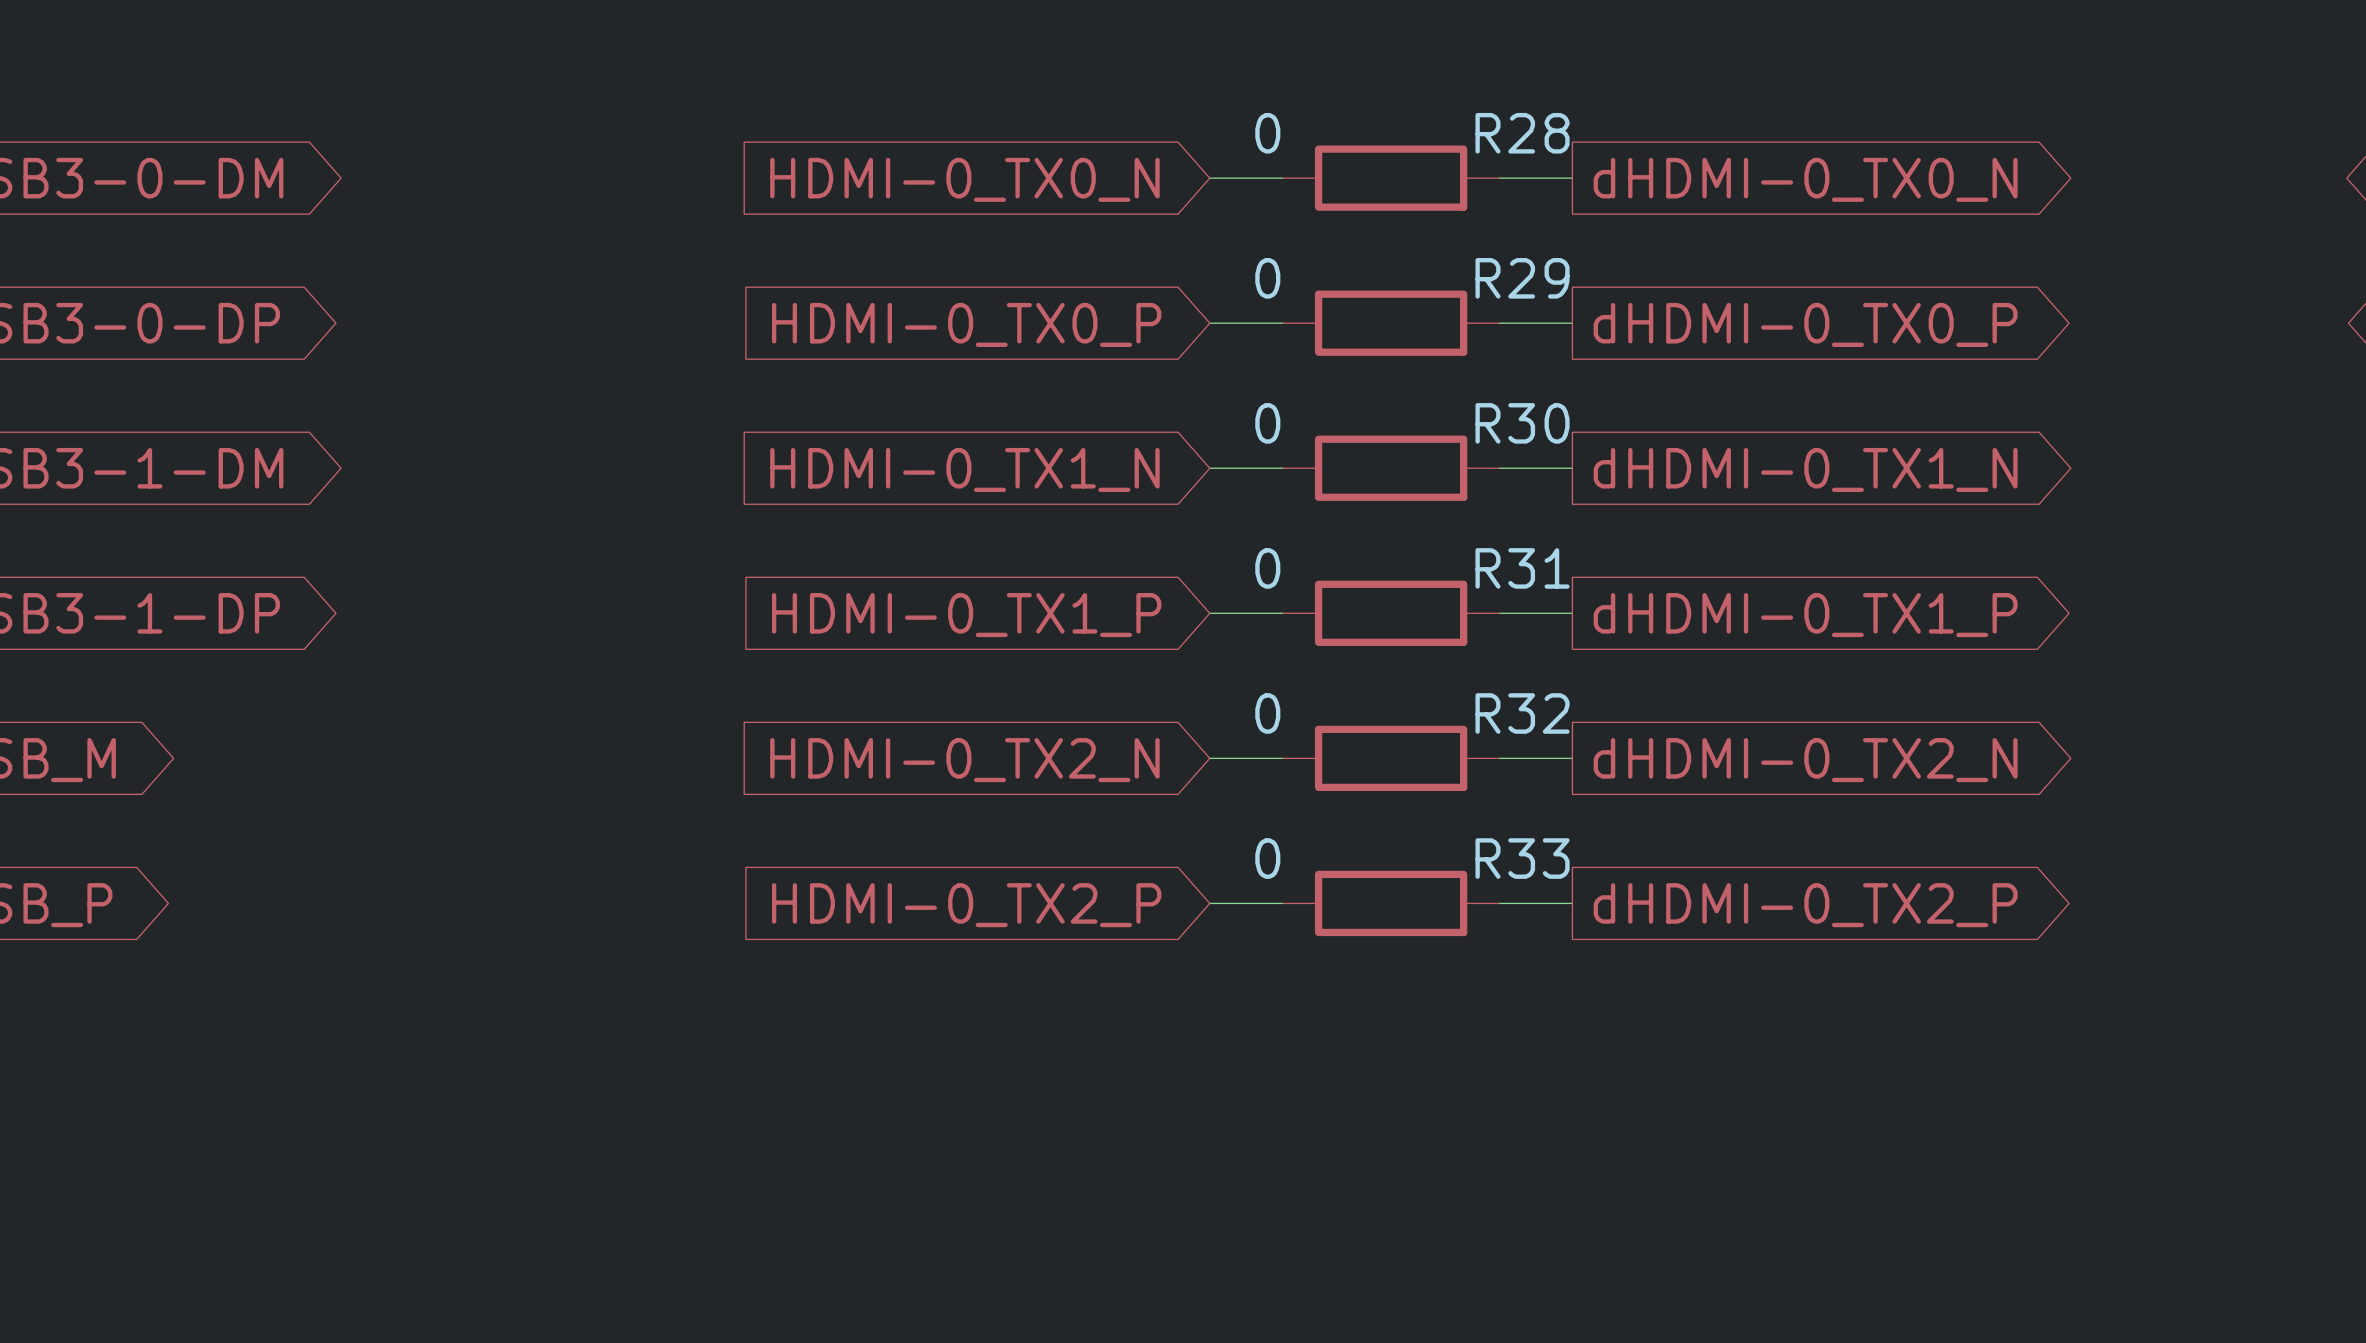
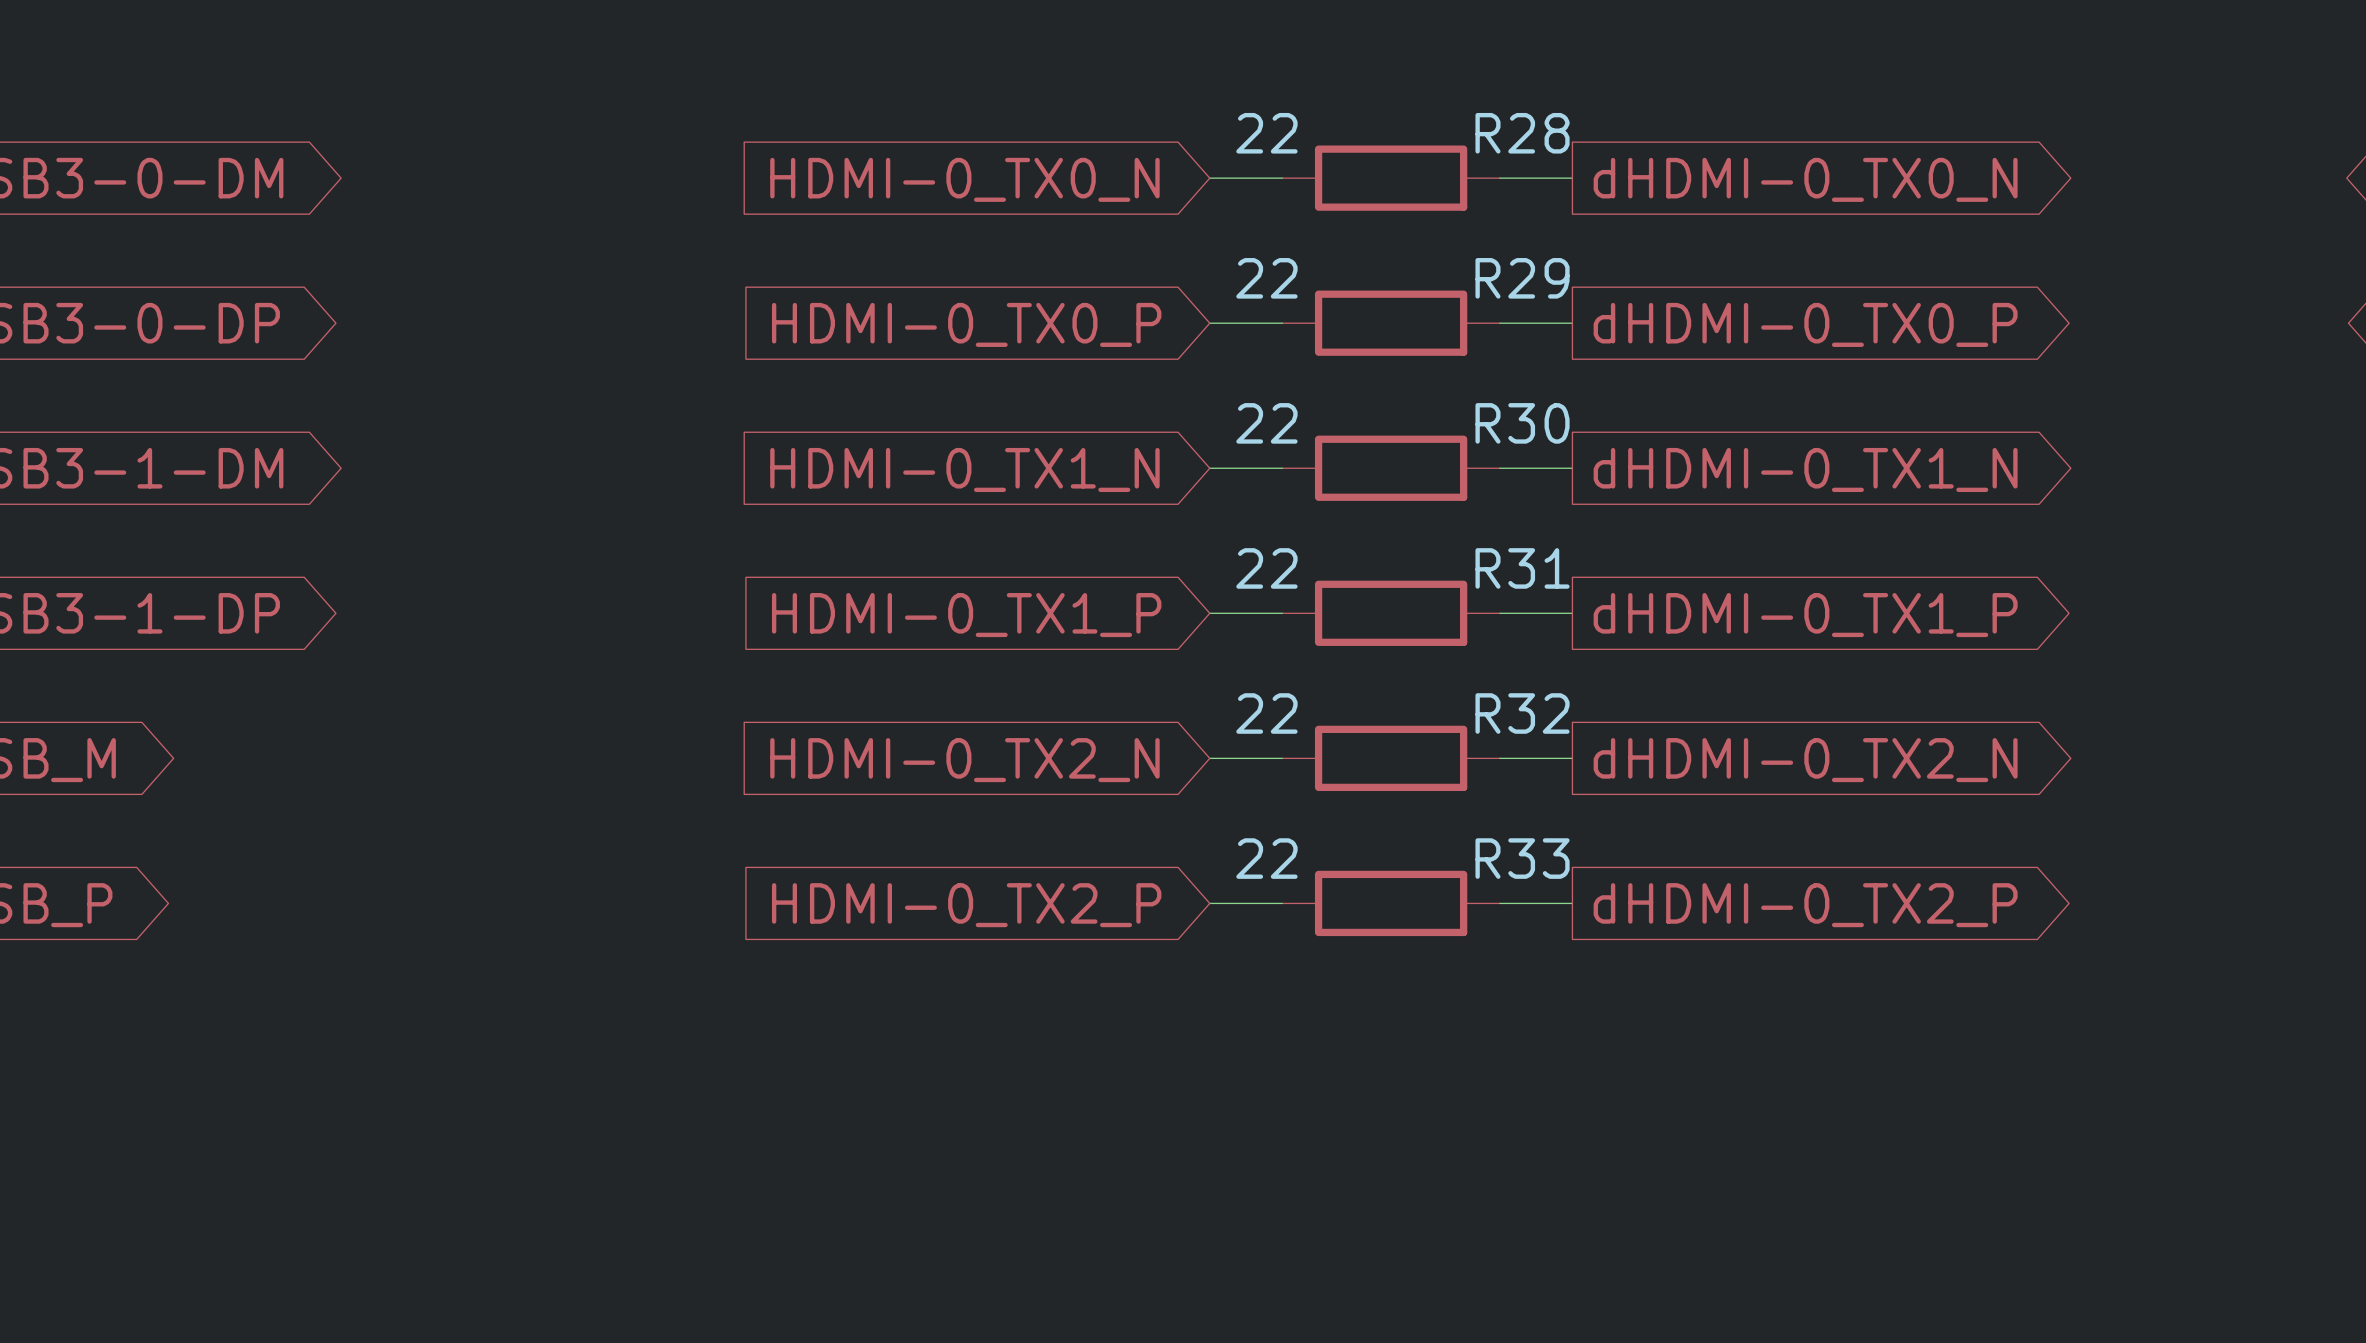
R28 value: 0 (1267, 133) -> 22 (1266, 133)
R29 value: 0 (1267, 278) -> 22 (1266, 278)
R30 value: 0 (1267, 423) -> 22 (1266, 423)
R31 value: 0 (1267, 568) -> 22 (1266, 568)
R32 value: 0 (1267, 713) -> 22 (1266, 713)
R33 value: 0 (1267, 858) -> 22 (1266, 858)

